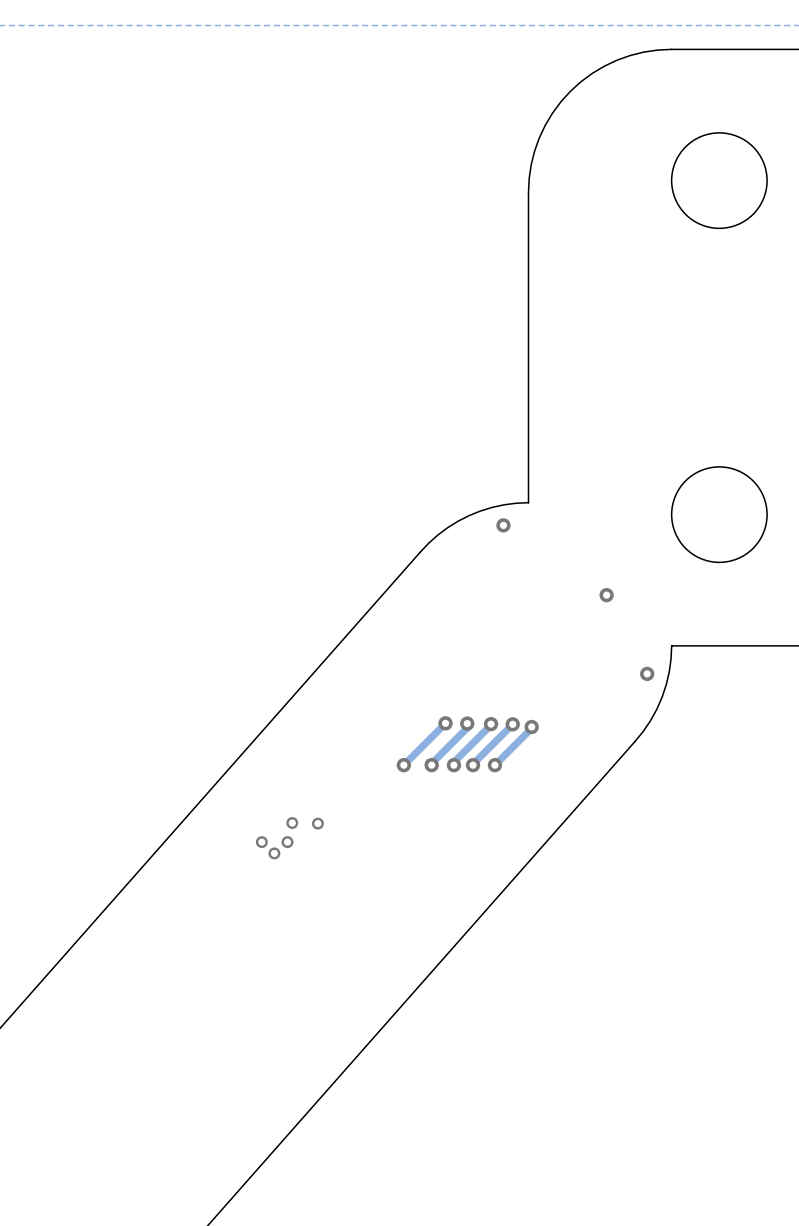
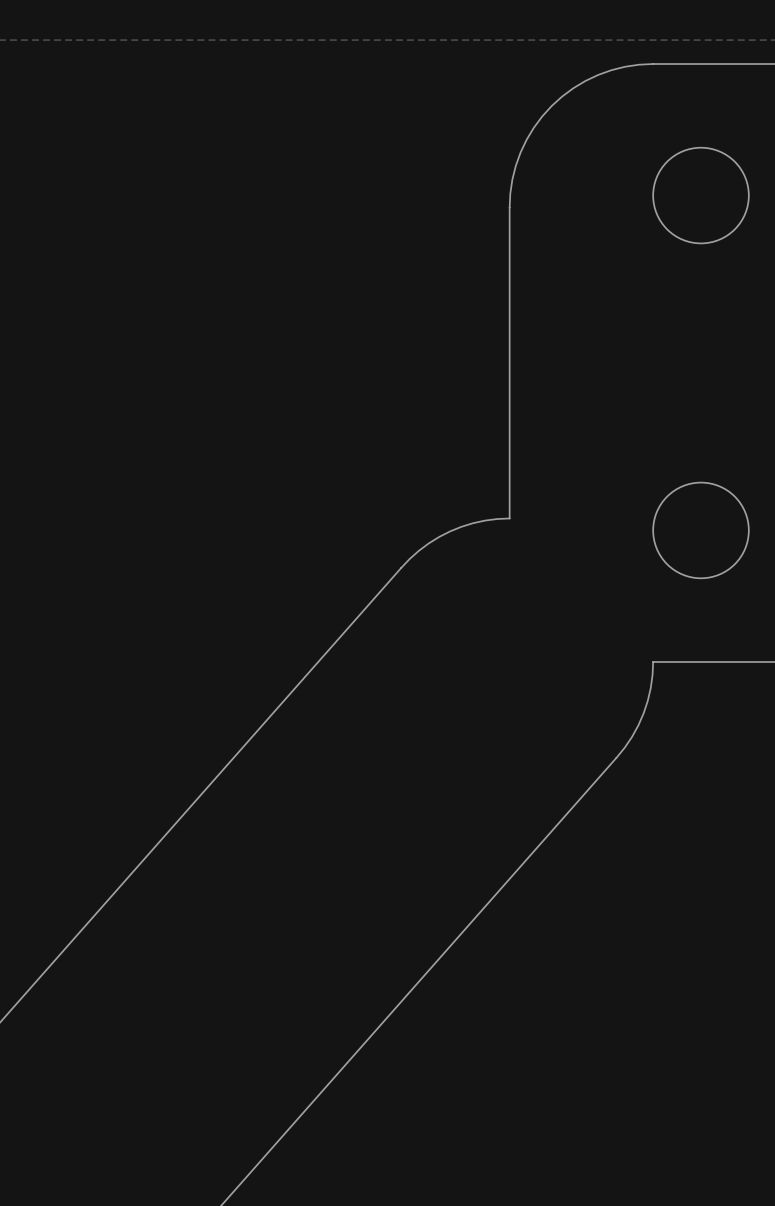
via: (503, 525) -> none
via: (606, 595) -> none
via: (647, 673) -> none
track: (445, 723) (403, 765) -> none
via: (445, 723) -> none
track: (467, 723) (467, 727) (432, 762) (429, 762) (431, 765) -> none
via: (467, 723) -> none
track: (491, 724) (453, 762) (453, 765) -> none
via: (491, 724) -> none
track: (512, 724) (473, 765) -> none
via: (512, 724) -> none
track: (531, 726) (494, 765) -> none
via: (531, 726) -> none
via: (403, 765) -> none
via: (431, 765) -> none
via: (453, 765) -> none
via: (473, 765) -> none
via: (494, 765) -> none
via: (292, 823) -> none
via: (317, 823) -> none
via: (261, 842) -> none
via: (287, 842) -> none
via: (274, 853) -> none

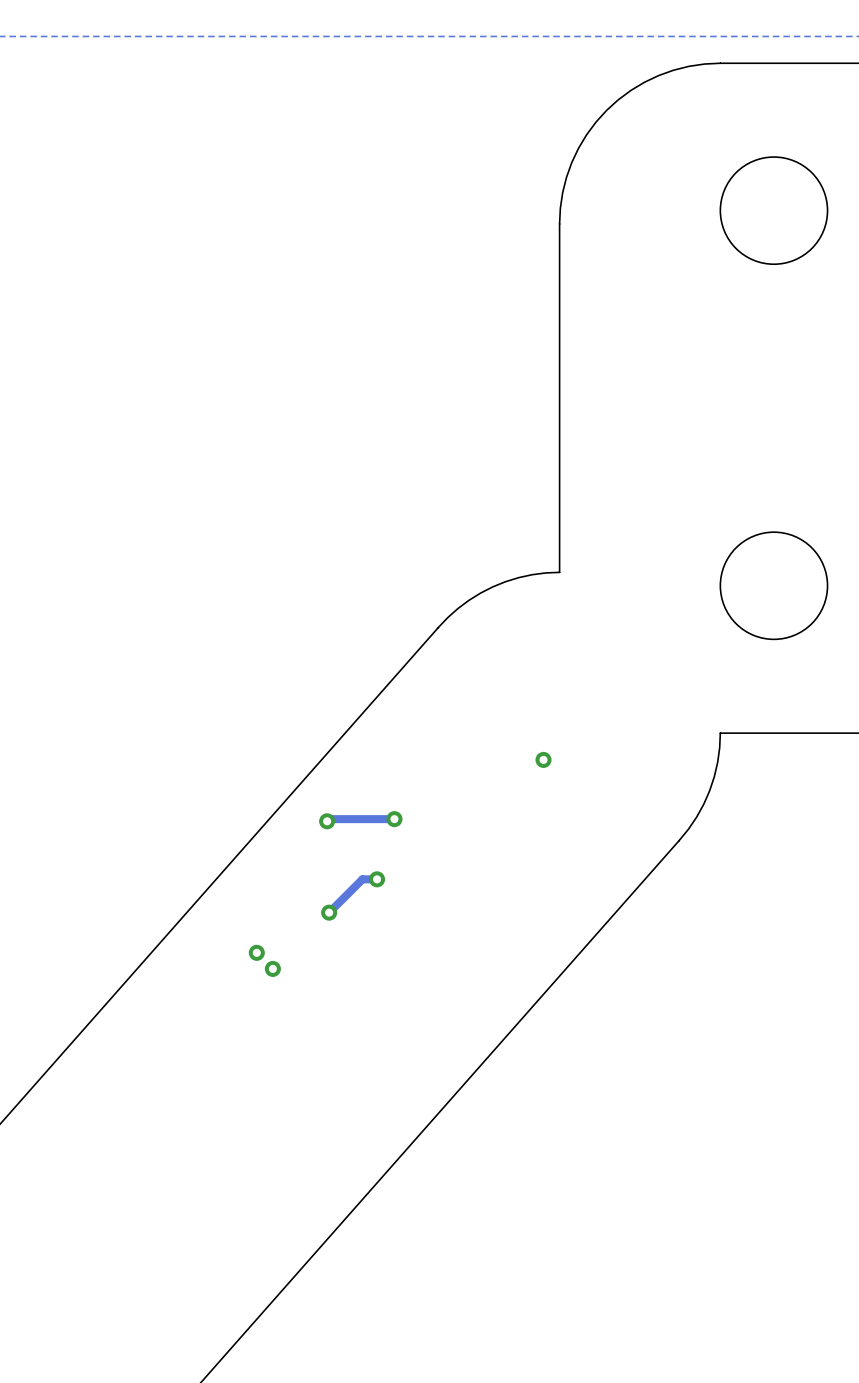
via: none -> (543, 759)
track: none -> (394, 819) (329, 819) (327, 821)
via: none -> (394, 819)
via: none -> (327, 821)
track: none -> (377, 879) (362, 879) (329, 912)
via: none -> (377, 879)
via: none -> (329, 912)
via: none -> (256, 952)
via: none -> (272, 968)

